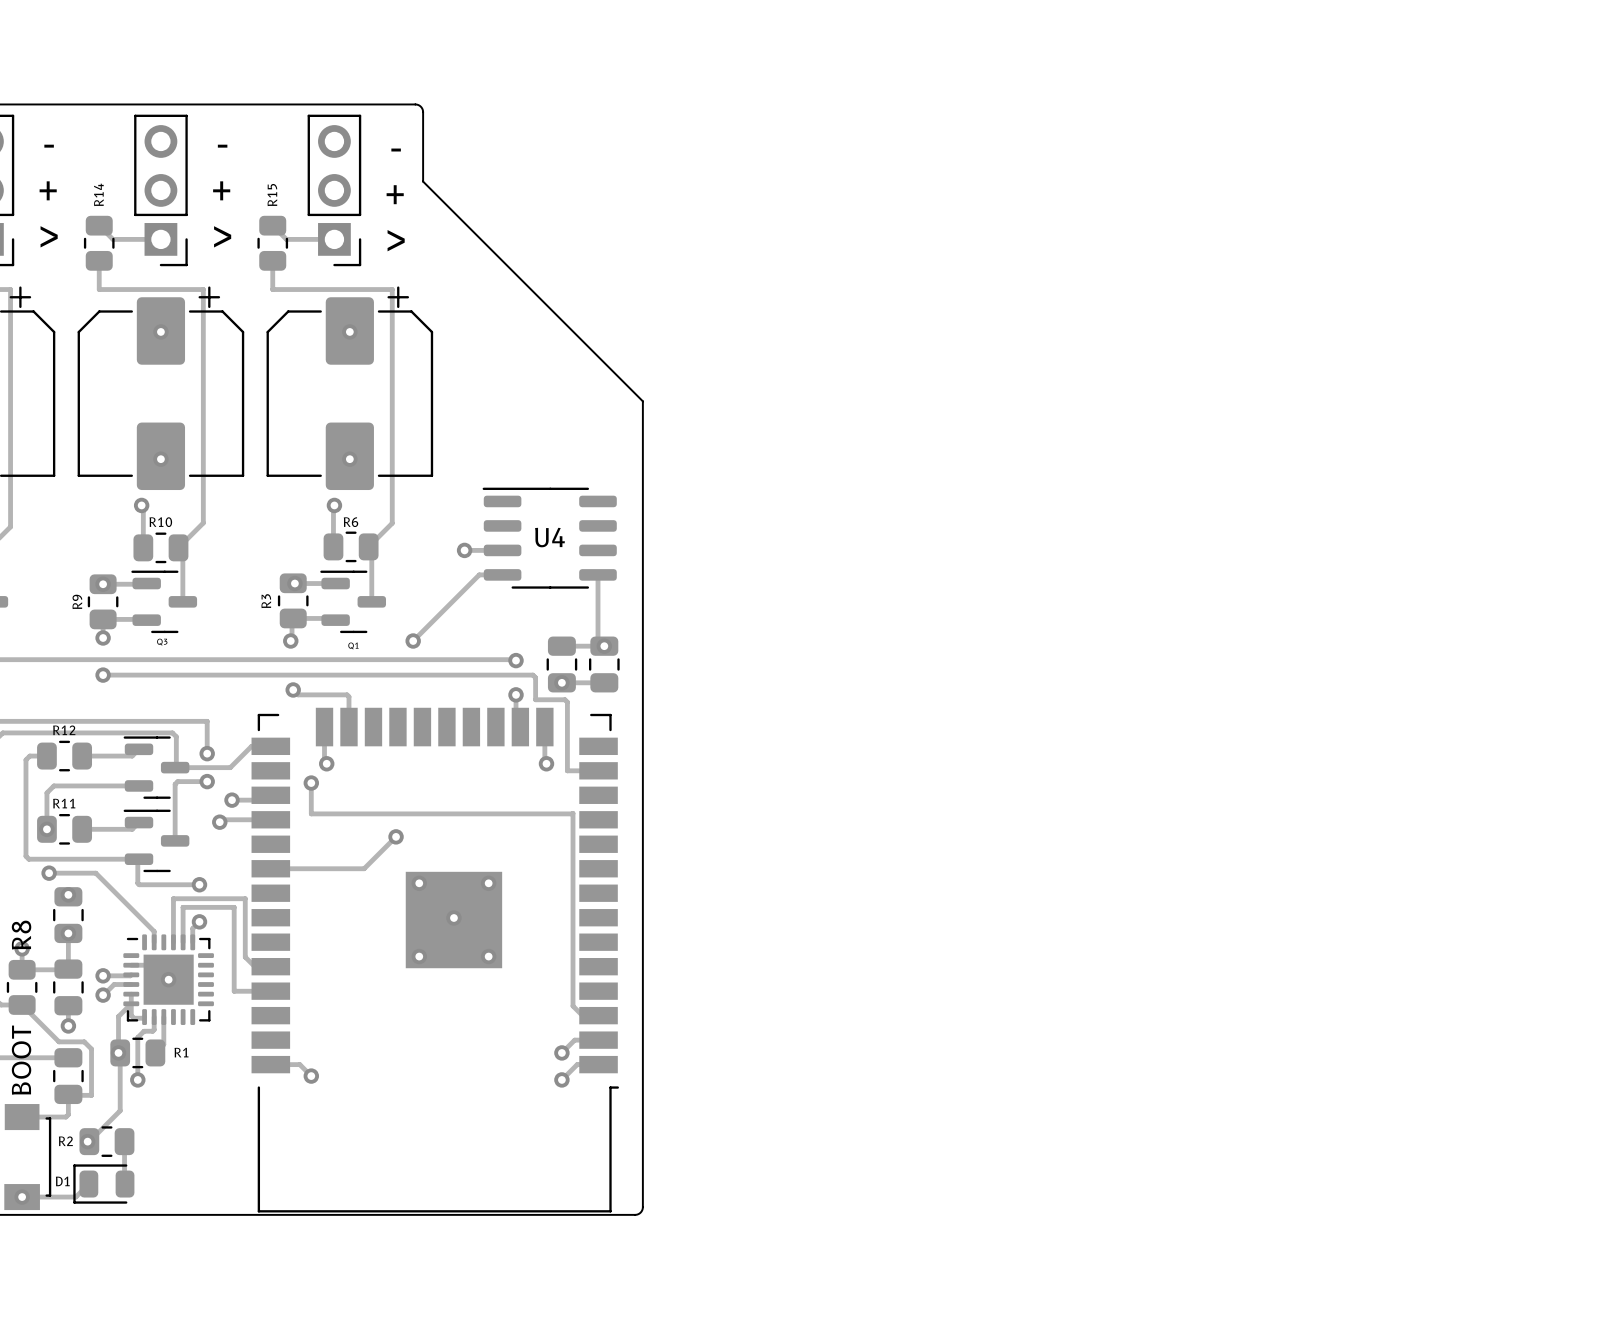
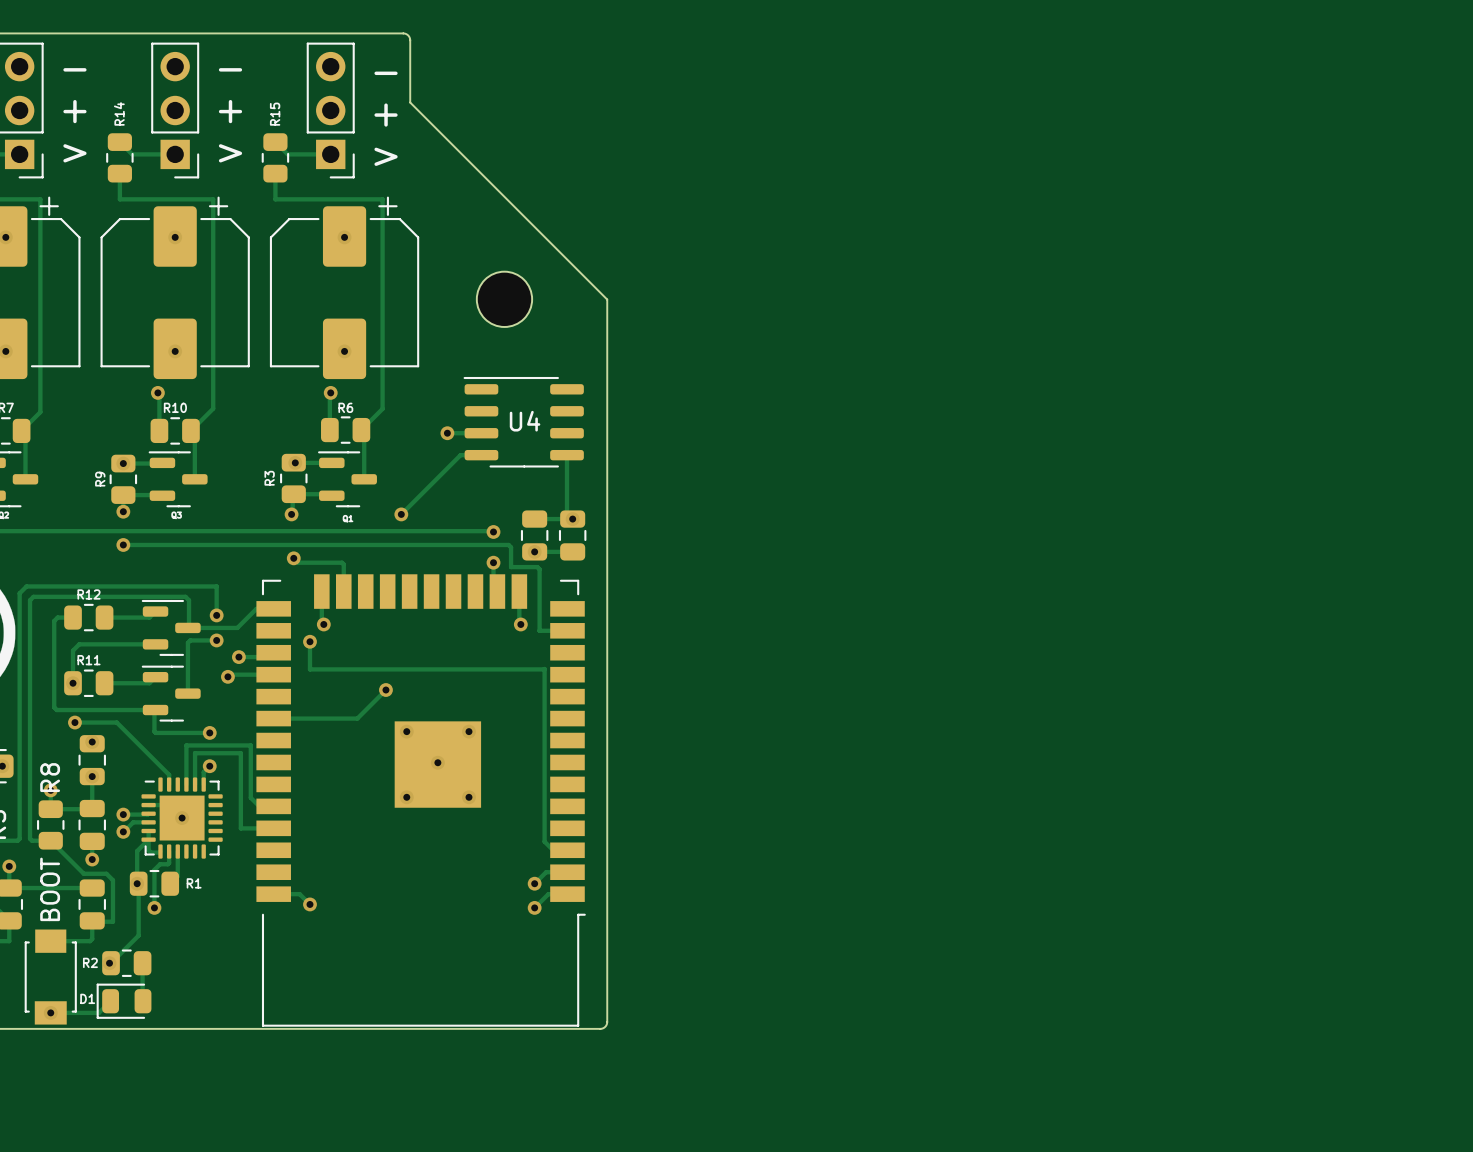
part: none -> (504, 299)

